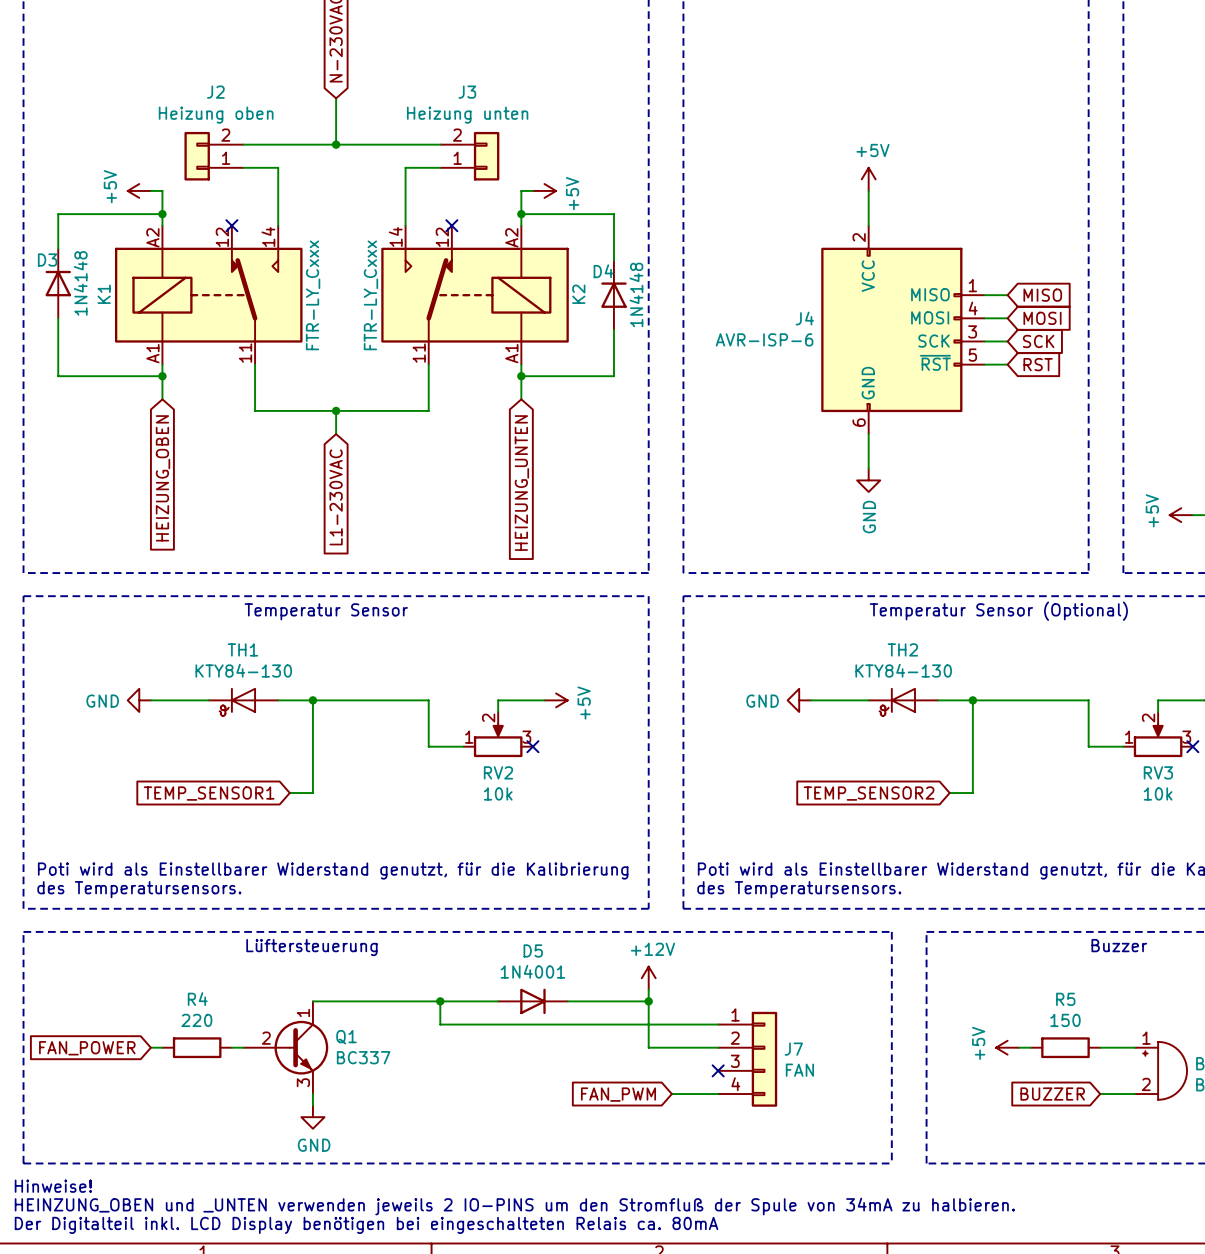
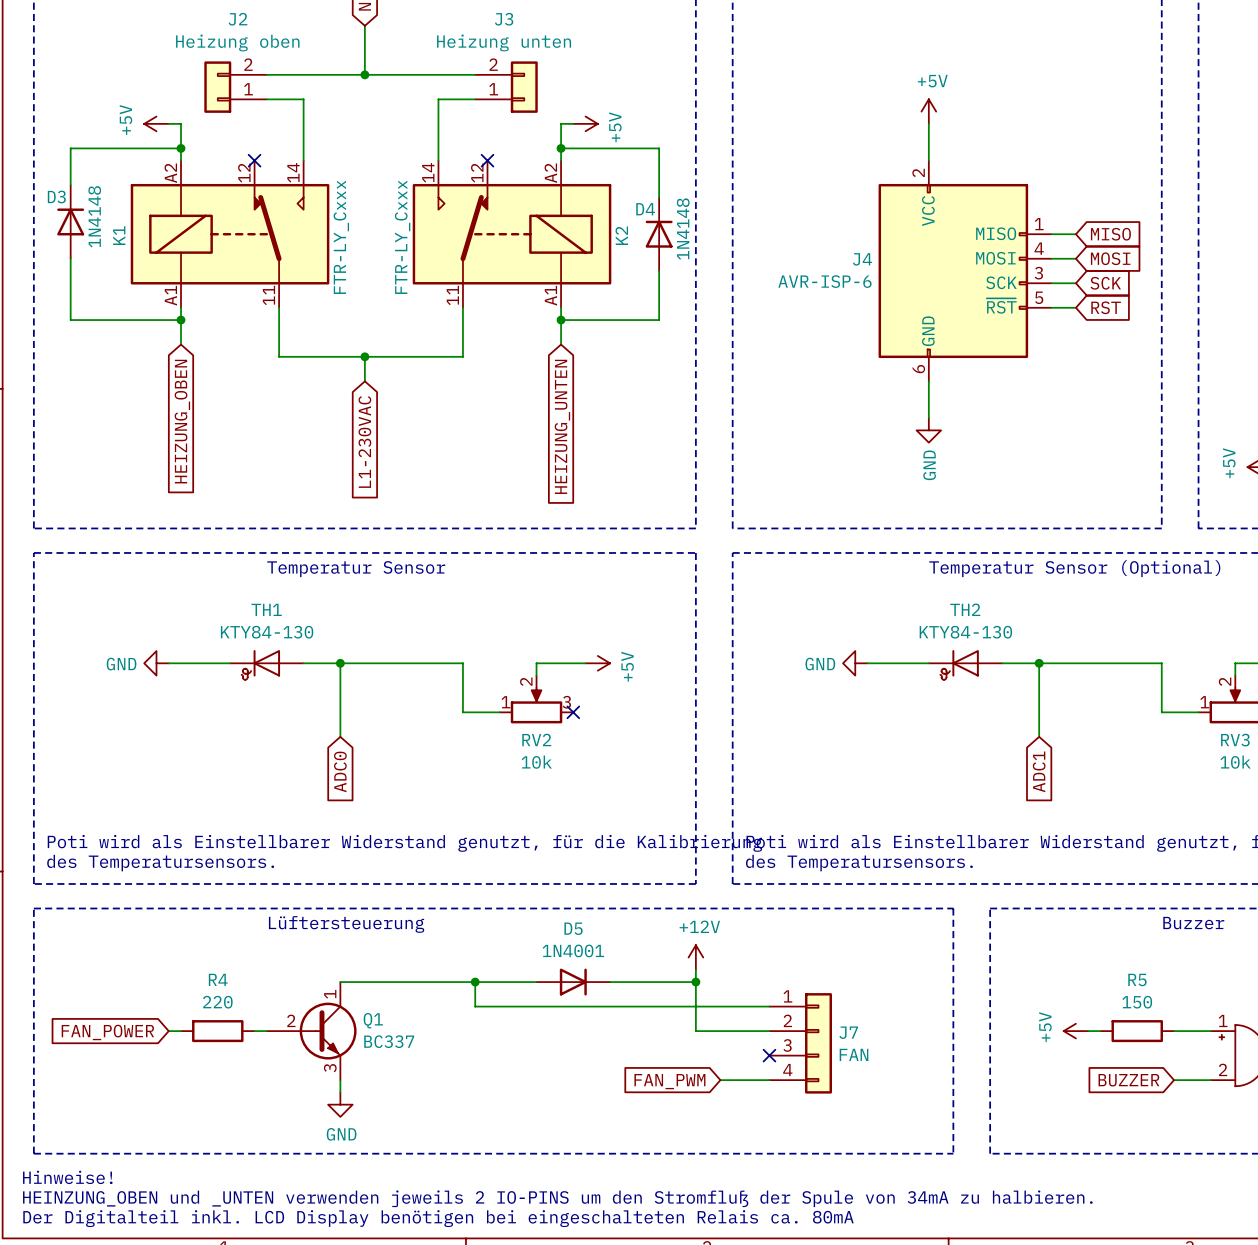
wire: (312, 769) (312, 793) (289, 793) -> none
wire: (972, 769) (972, 793) (949, 793) -> none
global label: TEMP_SENSOR1 (209, 793) -> none
global label: TEMP_SENSOR2 (869, 793) -> none
global label: none -> ADC0 (340, 771)
global label: none -> ADC1 (1039, 771)

